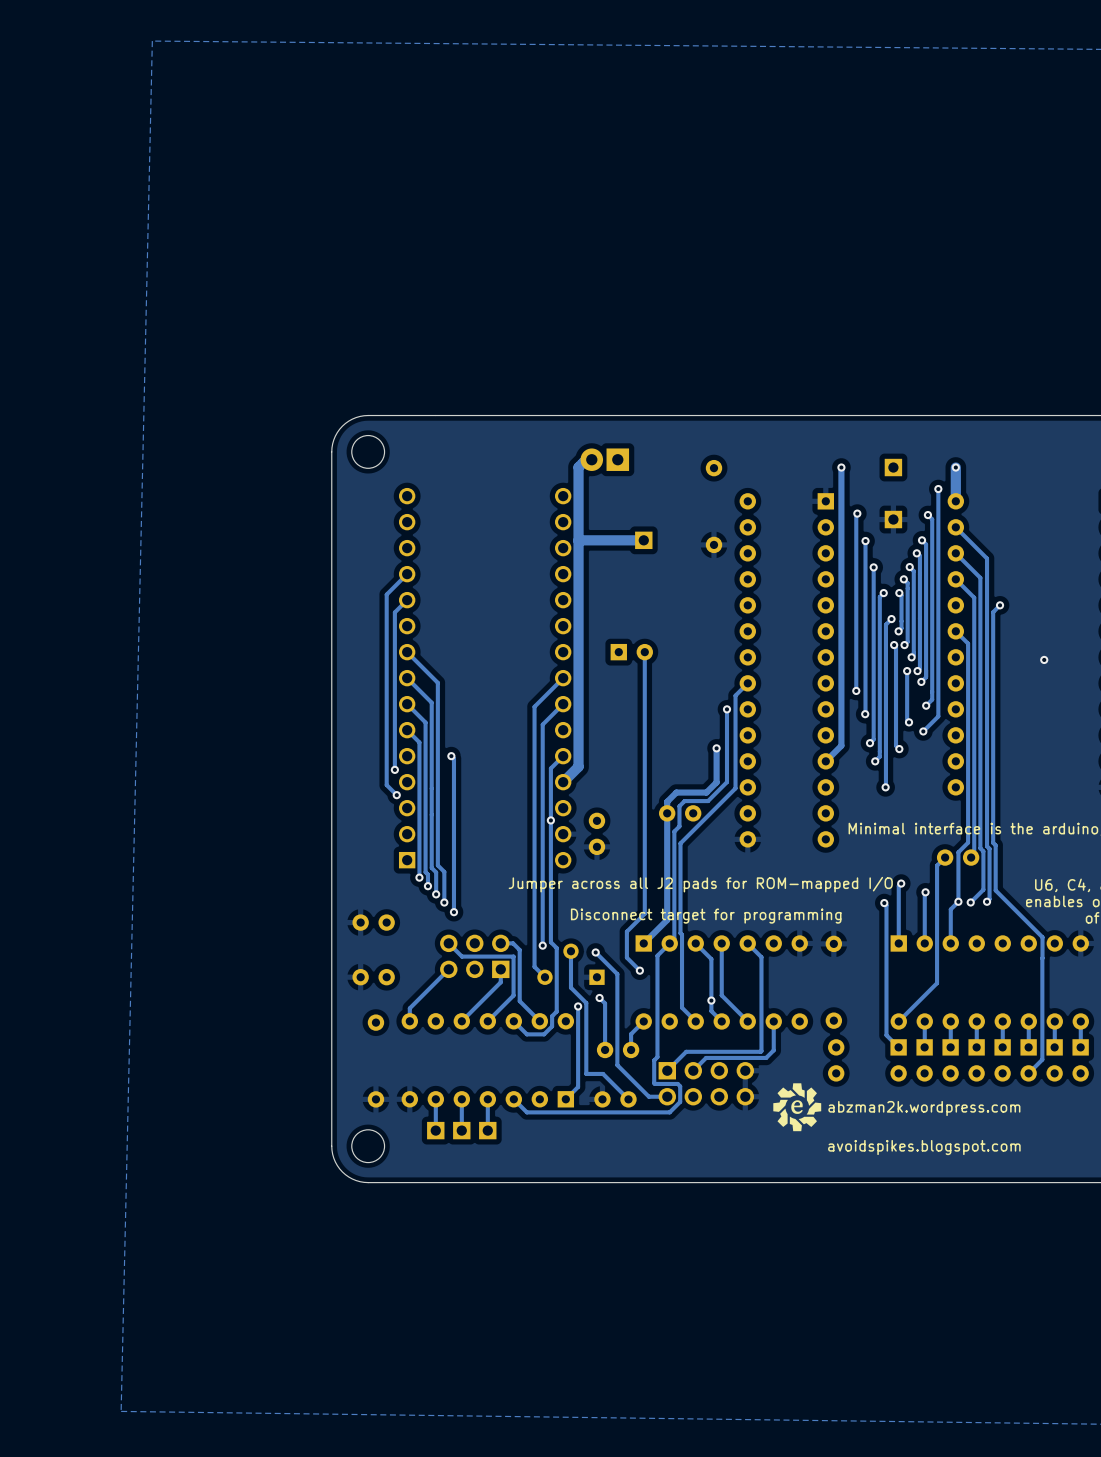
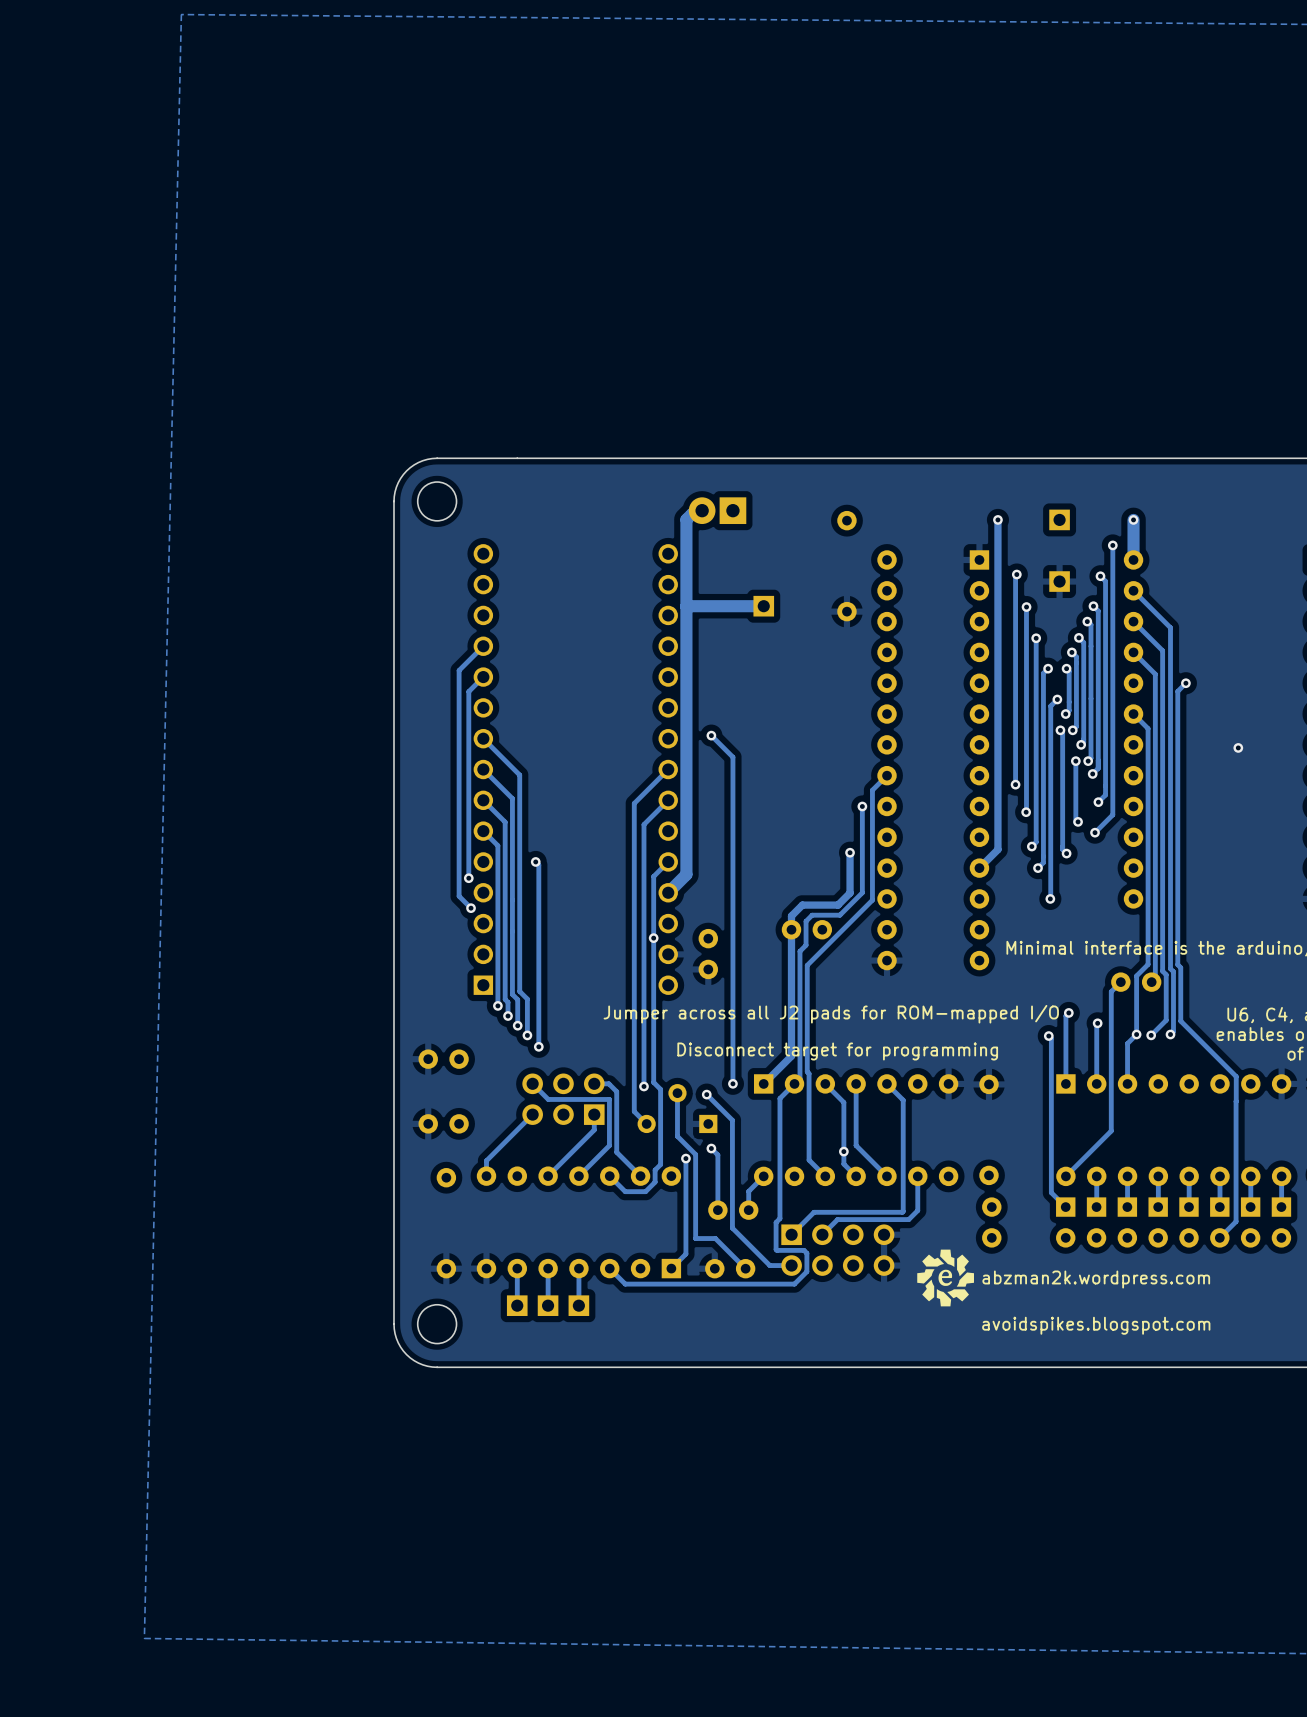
track: none -> (711, 735) (732, 757) (732, 1083)
via: none -> (711, 735)
part: (631, 652) -> none
track: (644, 652) (644, 913) (626, 931) (626, 957) (639, 970) -> none
via position: (639, 970) -> (732, 1083)

